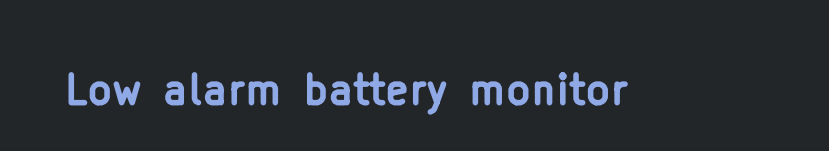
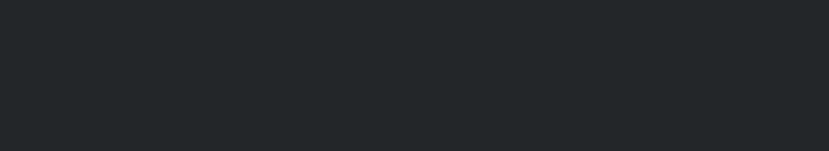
text: Low alarm battery monitor (348, 93) -> none

